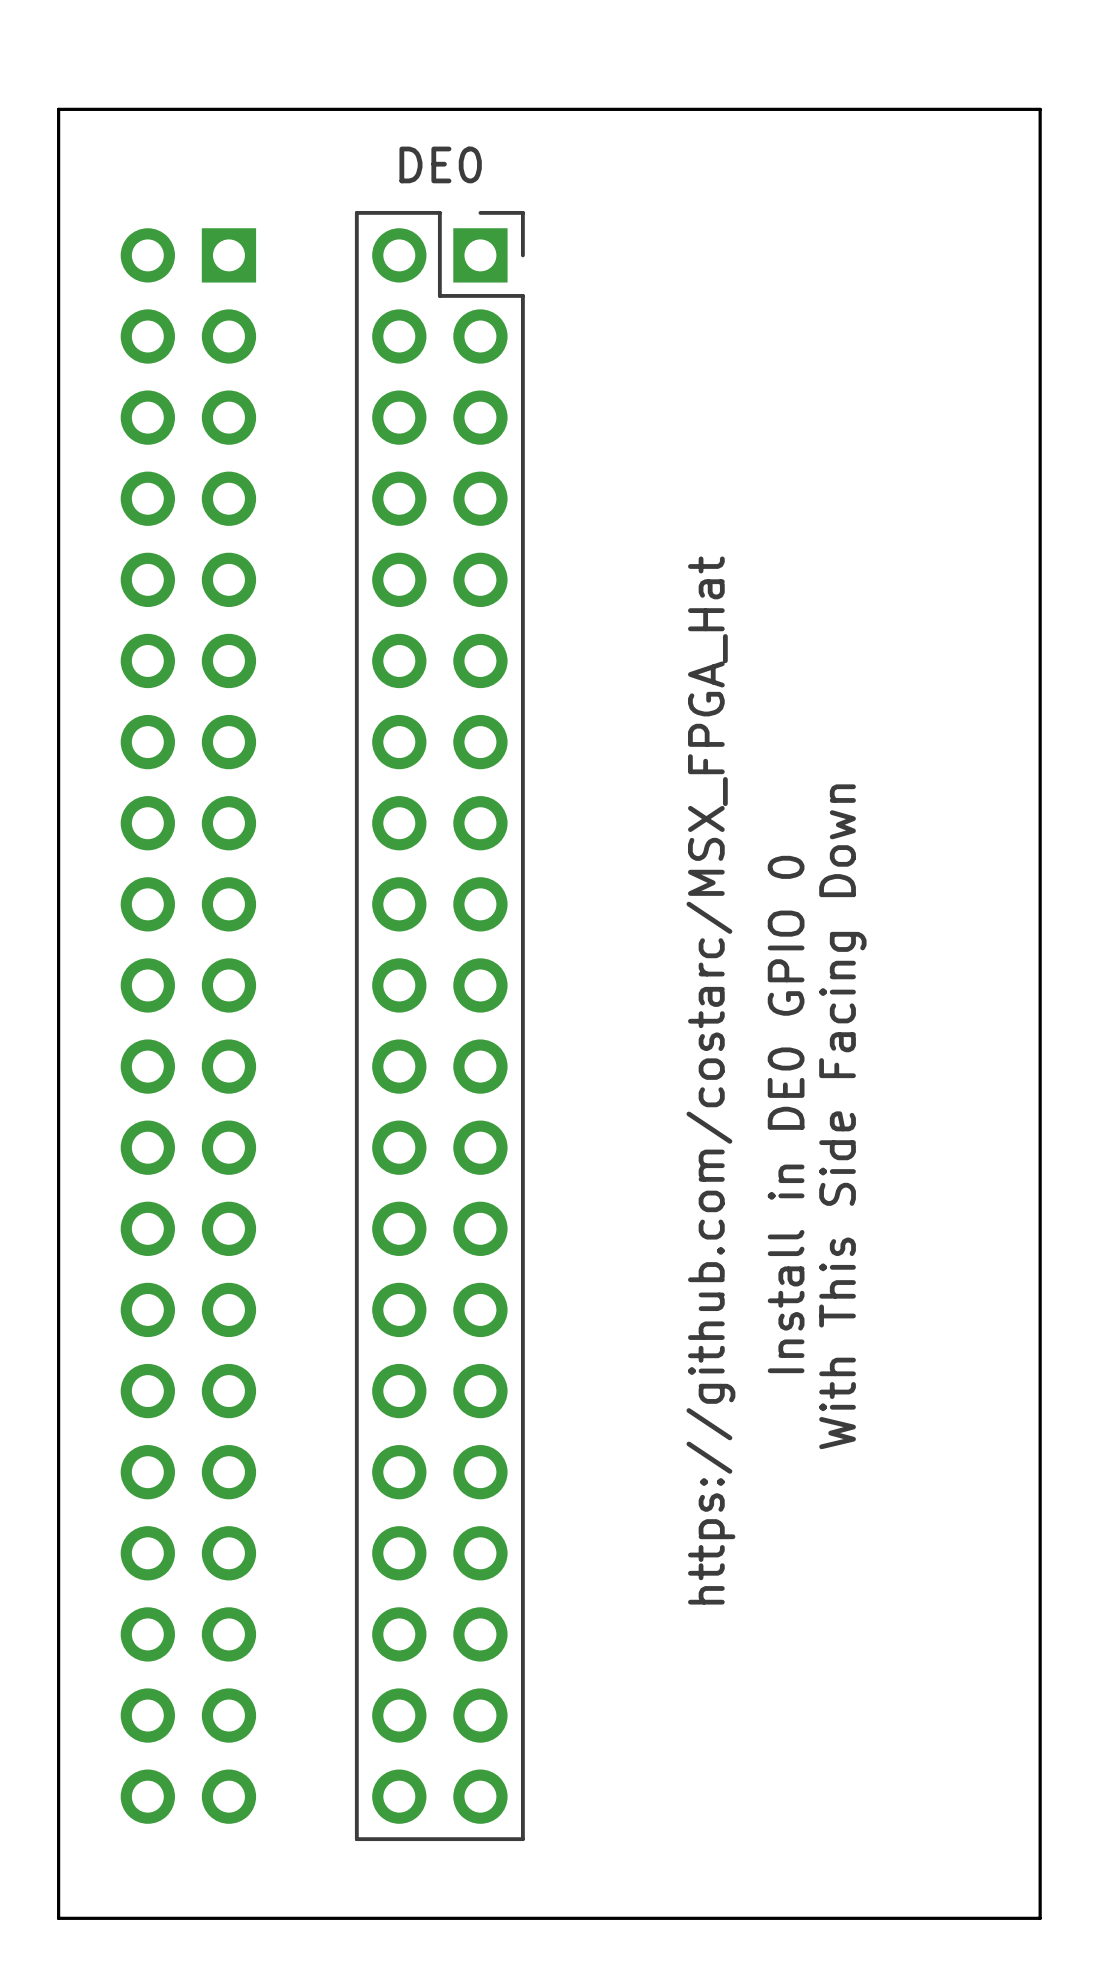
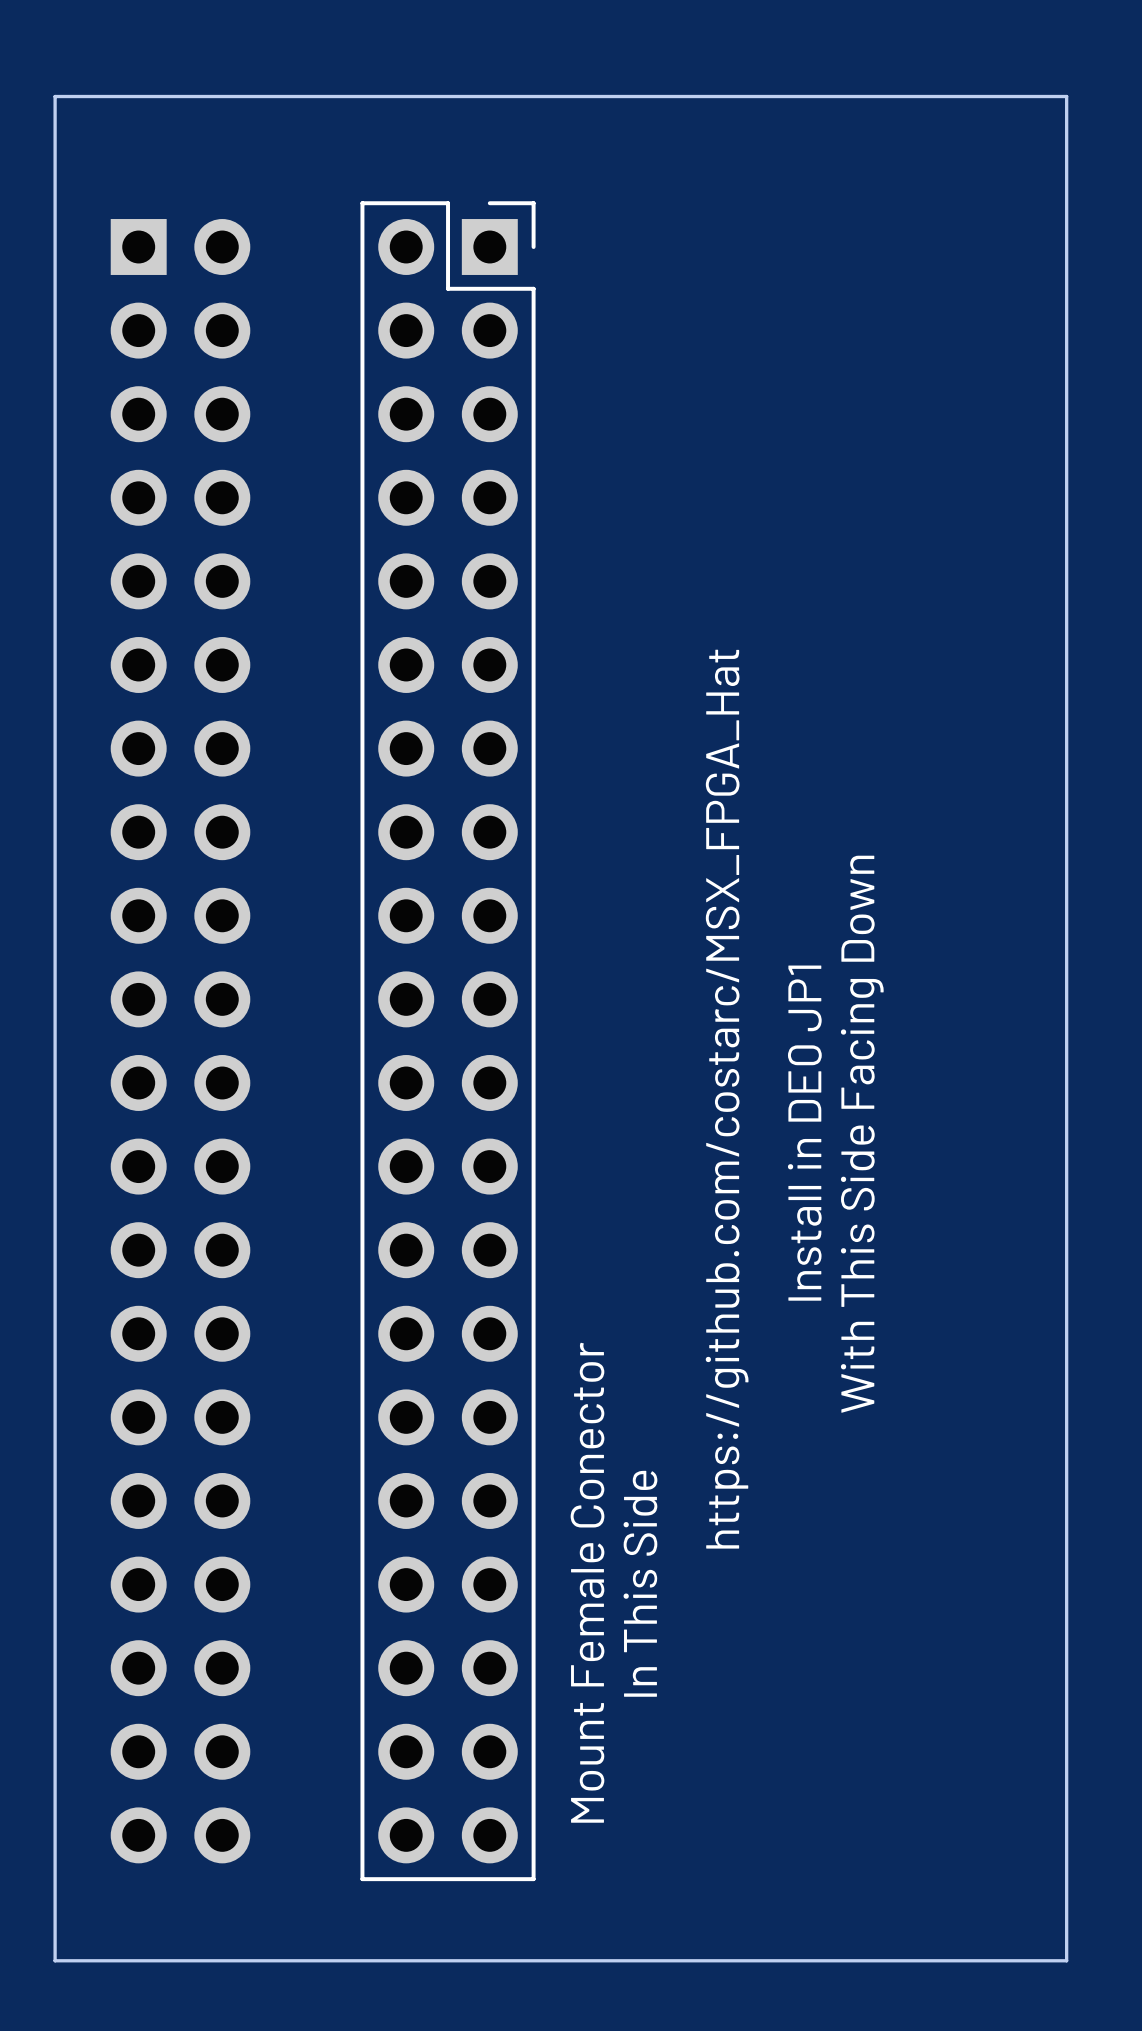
text: DE0 (440, 164) -> none
part footprint: [120, 228, 257, 1824] -> [110, 219, 251, 1864]
text: Install in DE0 GPIO 0 (786, 1114) -> Install in DE0 JP1 (804, 1133)
text: none -> Mount Female Conector (587, 1582)
text: none -> In This Side (640, 1583)

